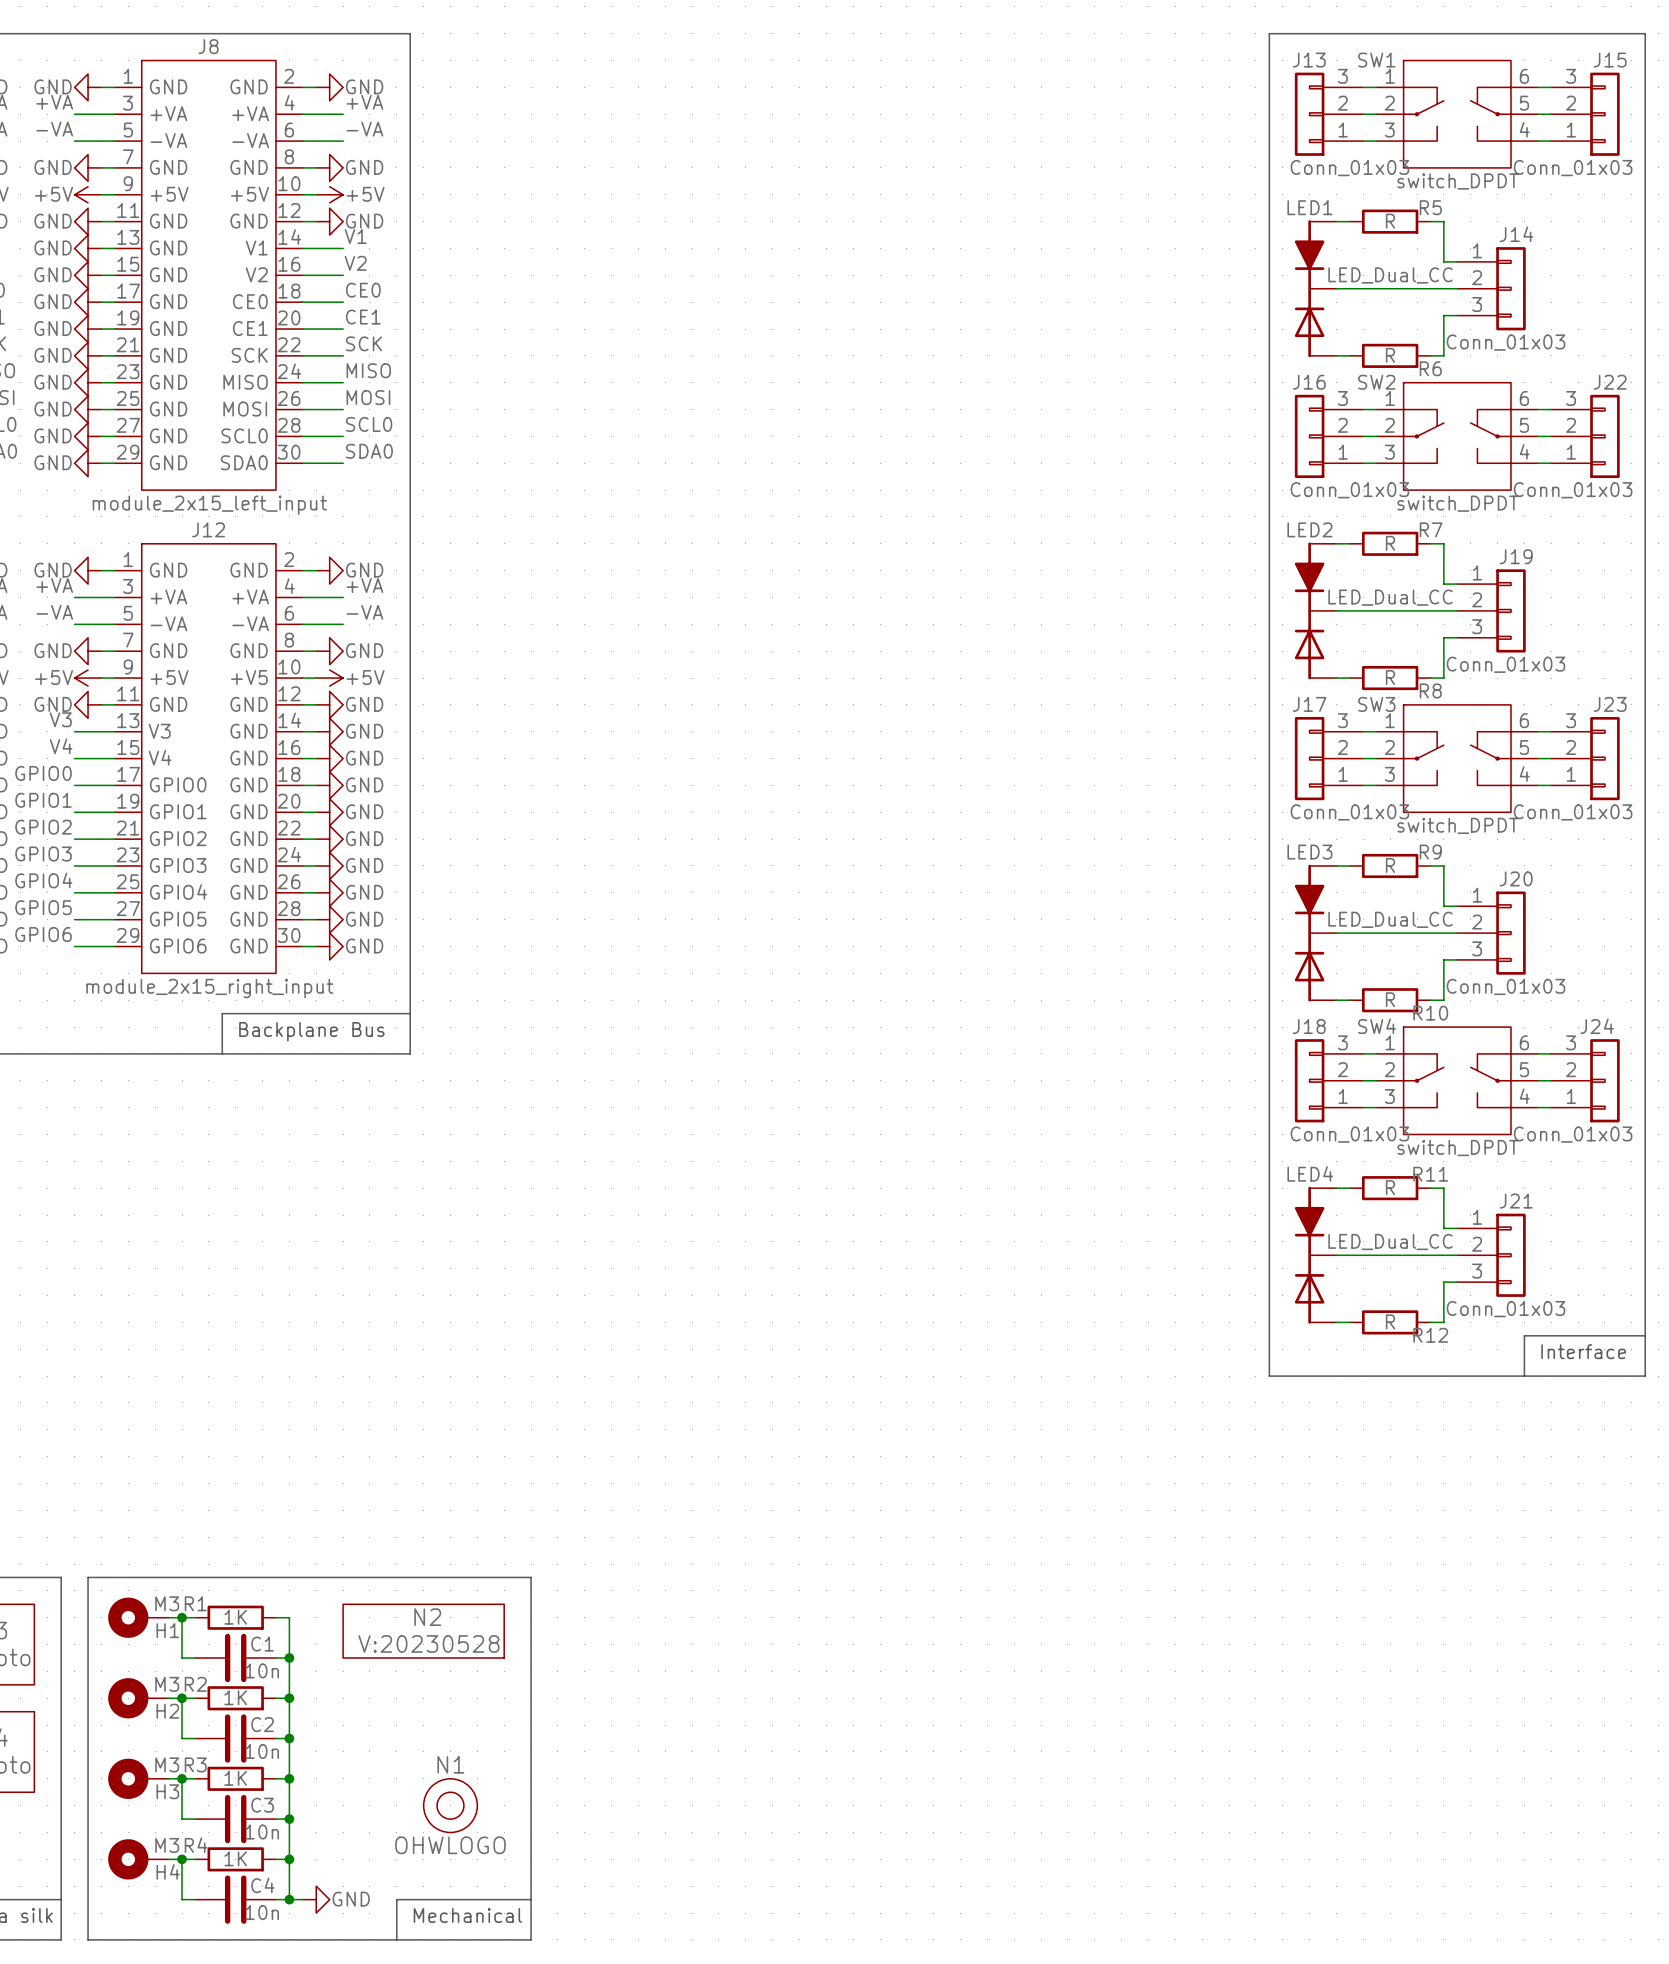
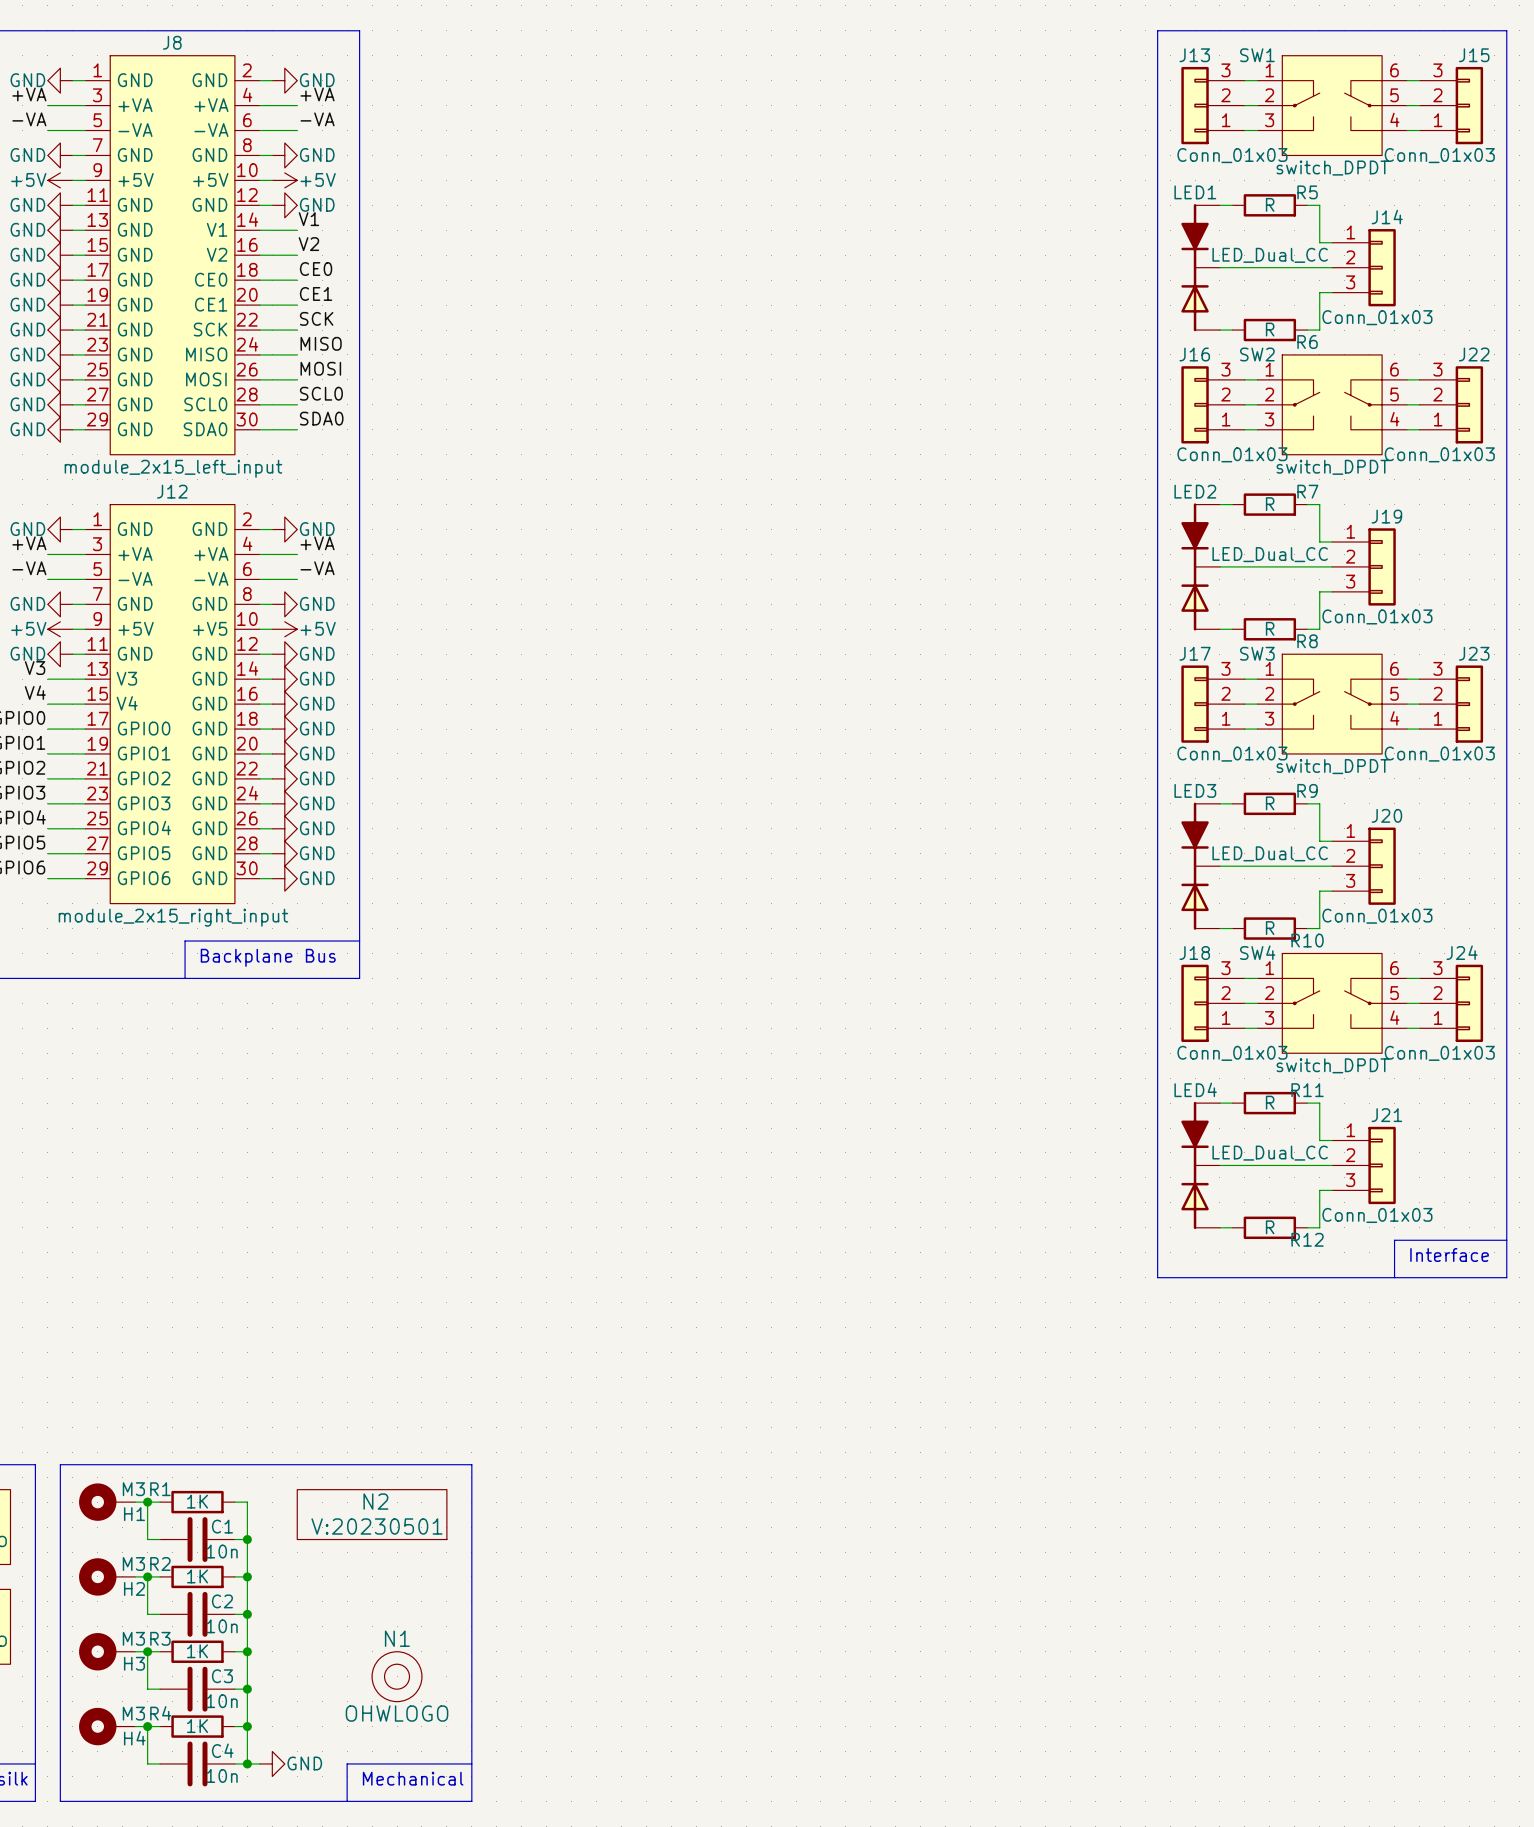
N2 value: V:20230528 (428, 1643) -> V:20230501 (376, 1526)

